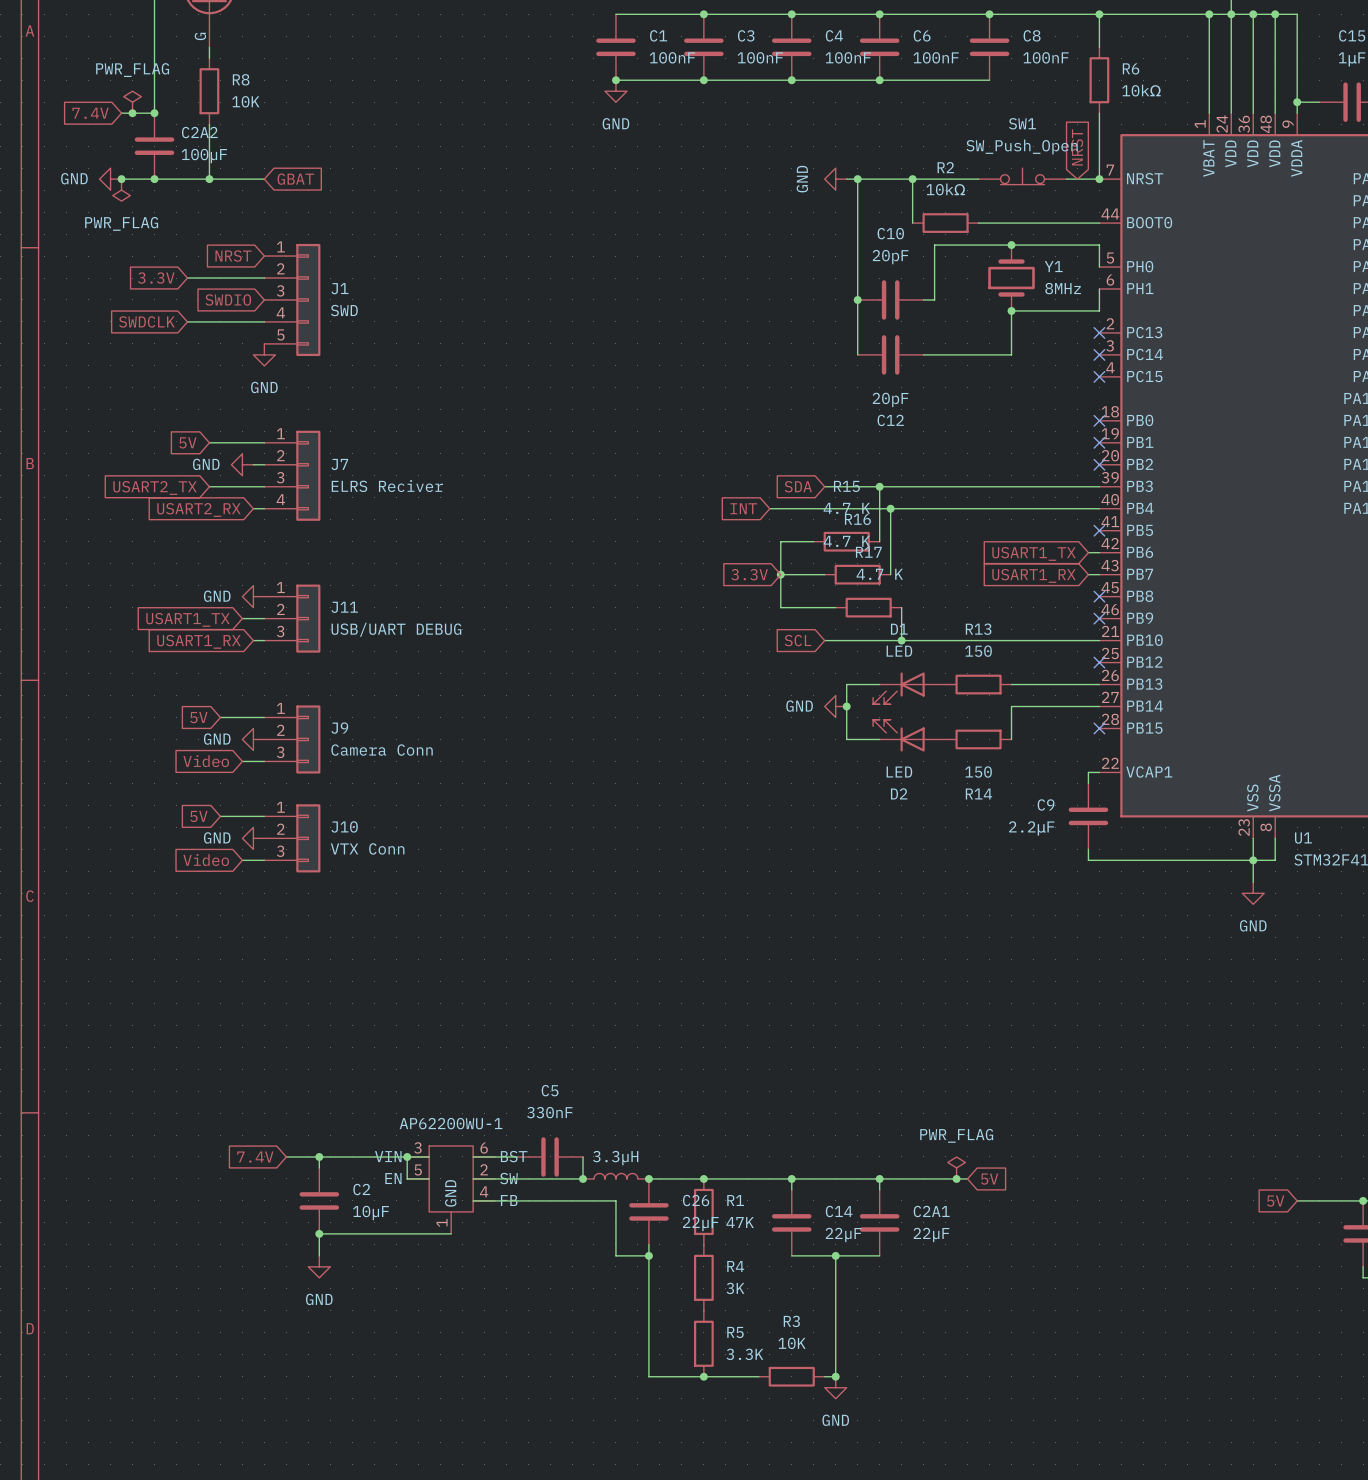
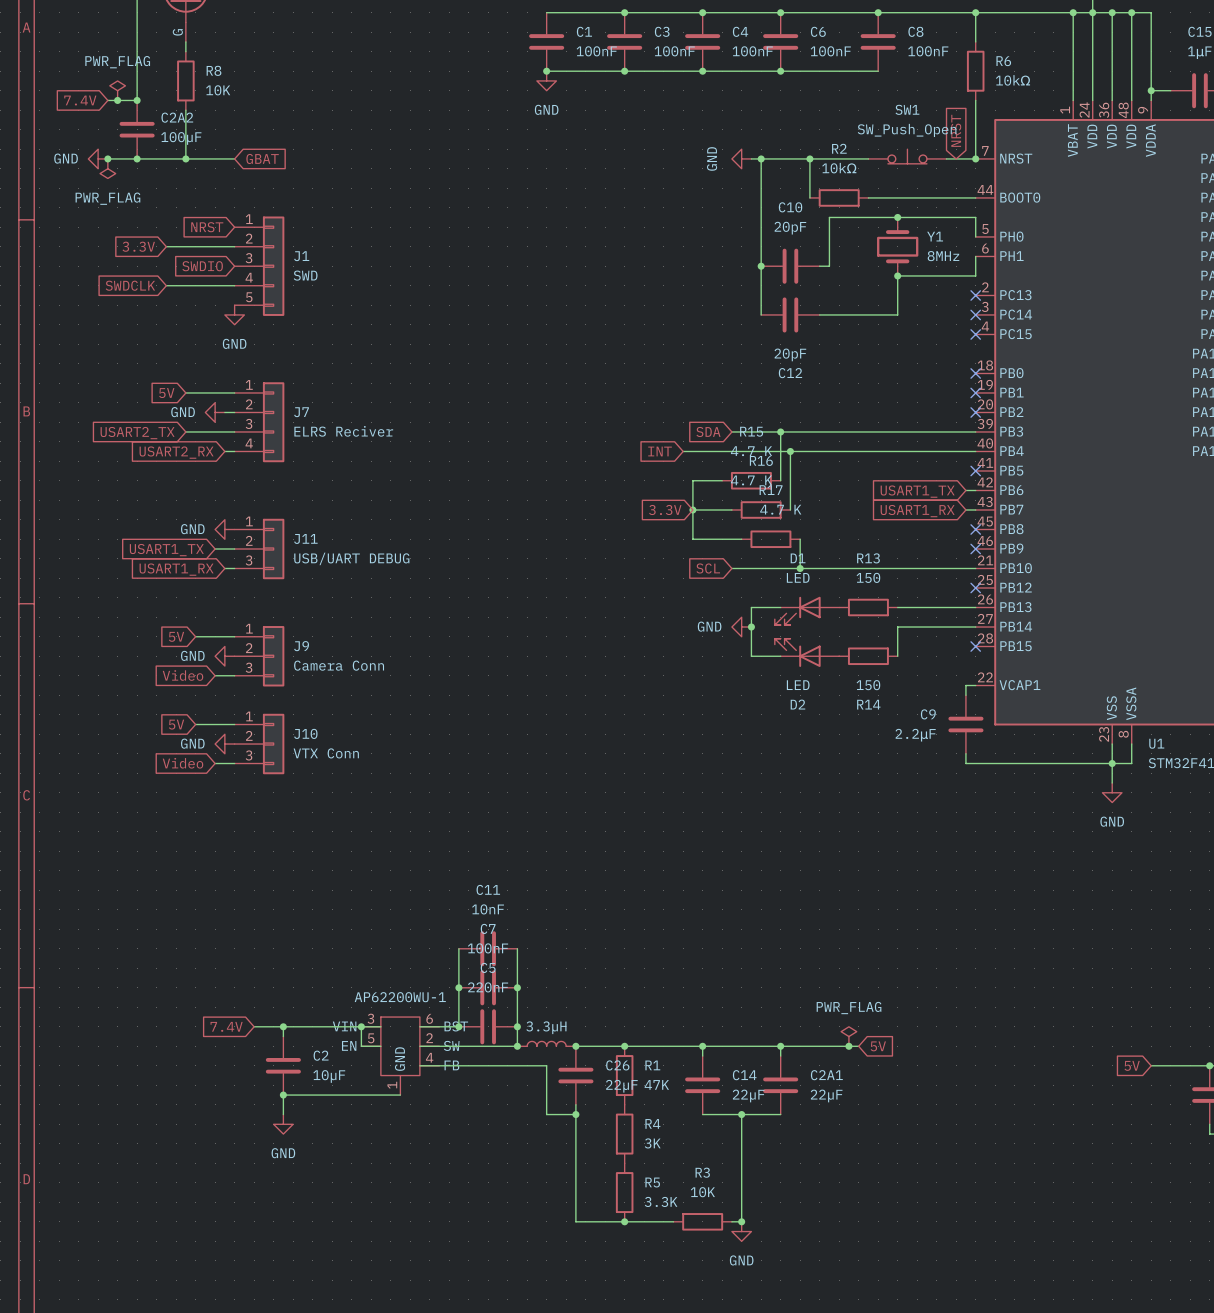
wire: none -> (458, 948) (458, 1026)
C11: none -> 10nF (488, 948)
wire: none -> (517, 948) (517, 1026)
C5 value: 330nF (549, 1112) -> 220nF (488, 987)
junction: none -> (458, 987)
C7: none -> 100nF (488, 987)
junction: none -> (517, 987)
junction: none -> (458, 1026)
junction: none -> (517, 1026)

